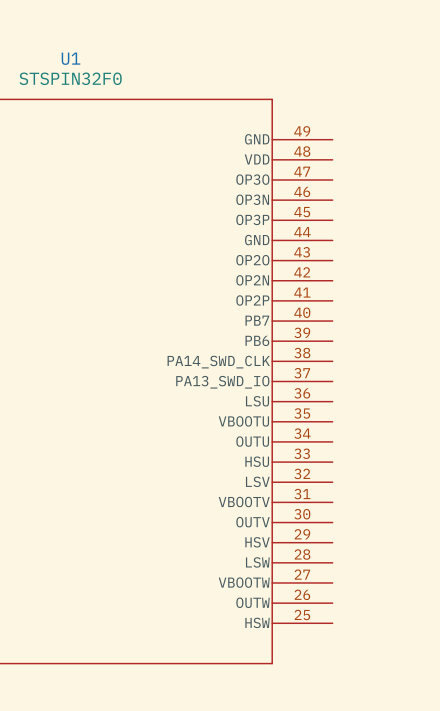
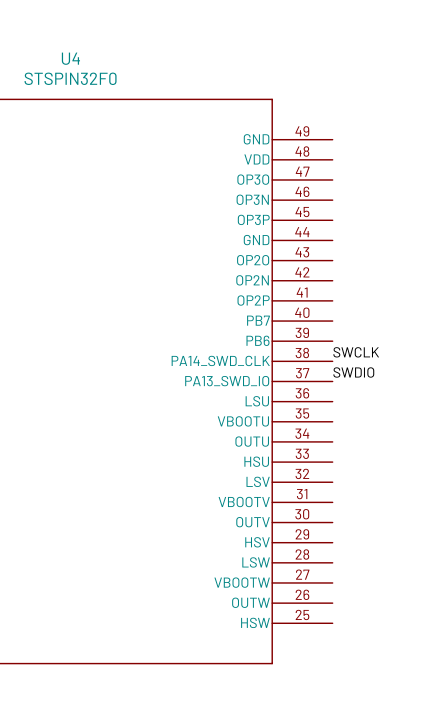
U1 name: U1 (71, 58) -> U4 (70, 58)
label: none -> SWCLK (356, 352)
label: none -> SWDIO (353, 372)

